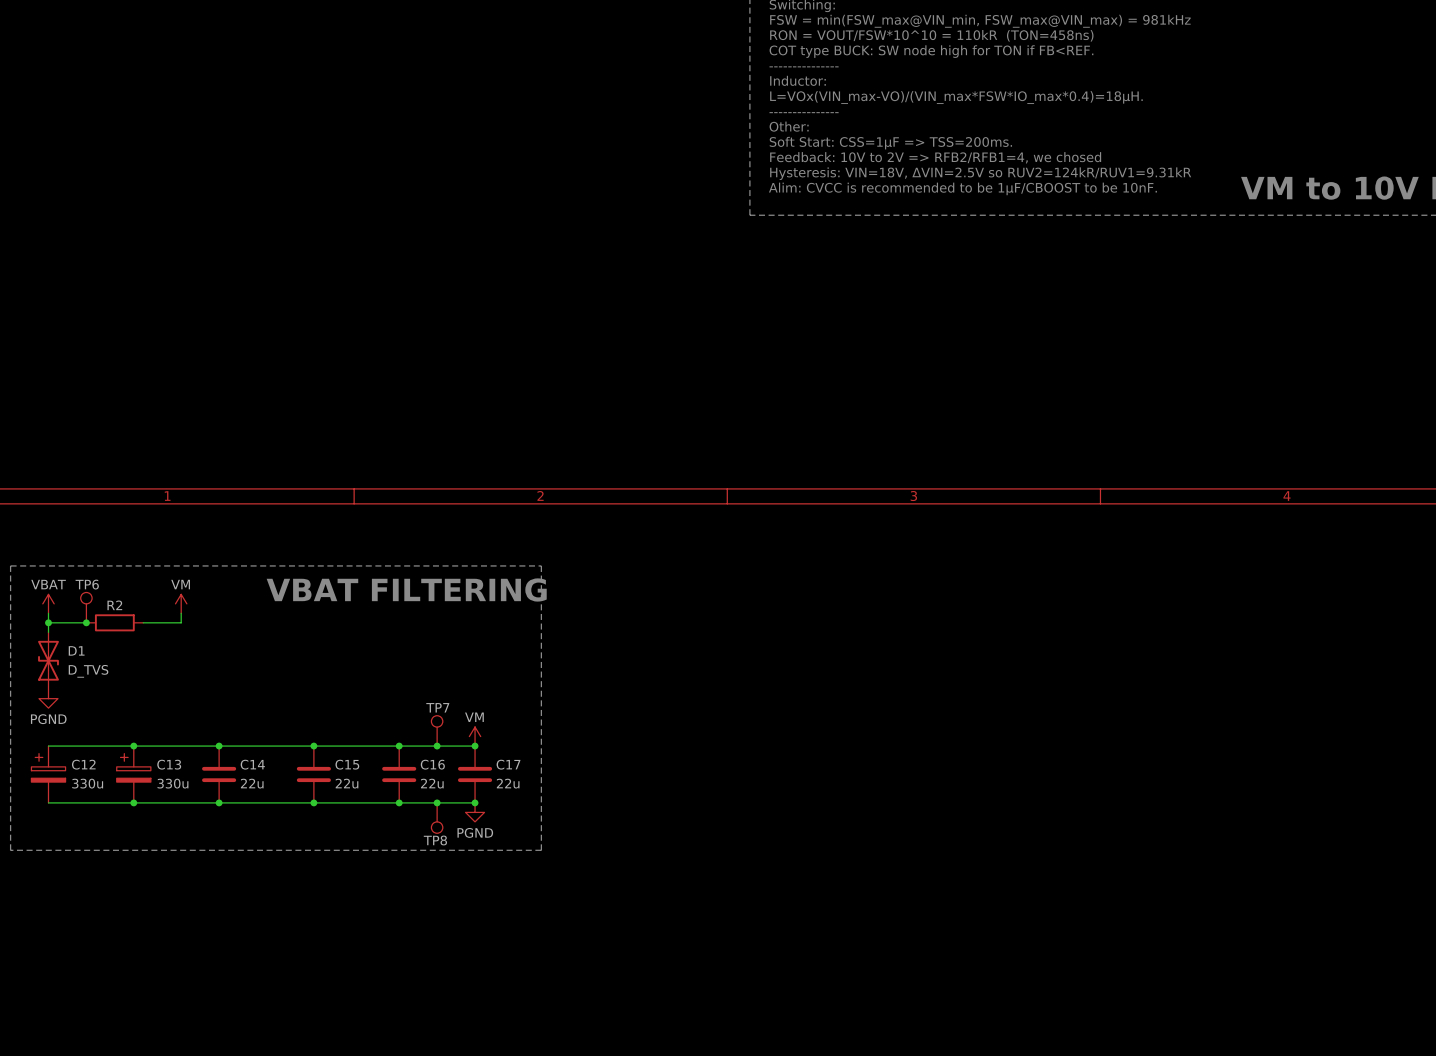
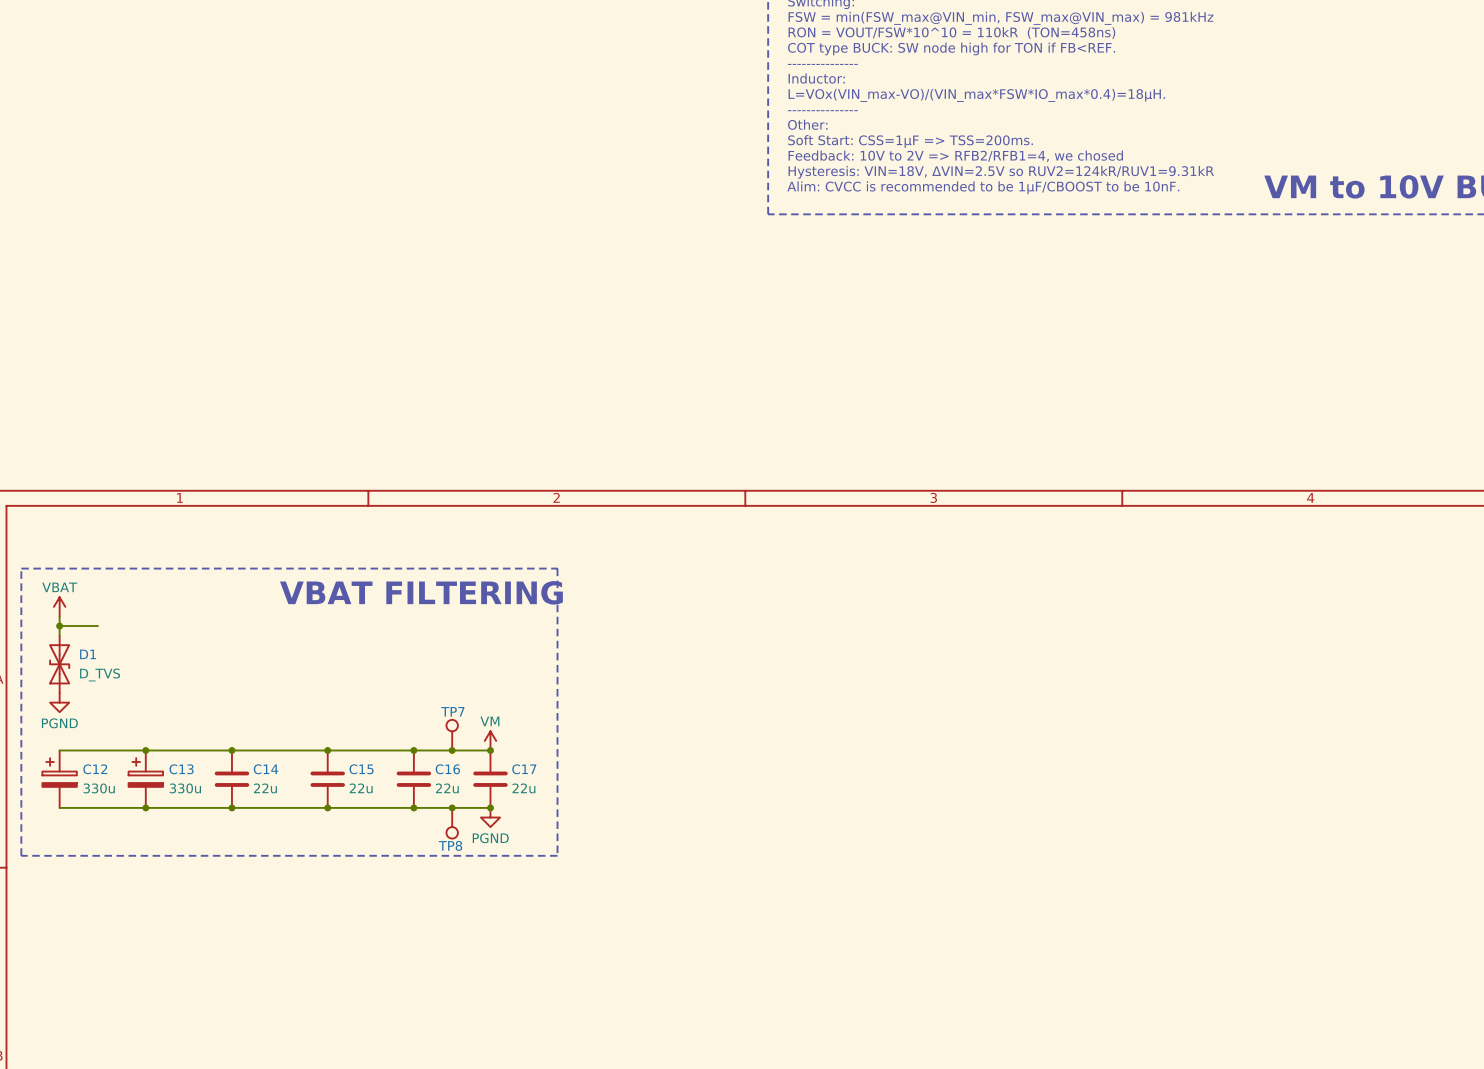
power symbol: VM (181, 603) -> none
TP6: (86, 607) -> none
wire: (181, 613) (181, 622) (143, 622) -> none
junction: (86, 622) -> none
R2: (114, 622) -> none

